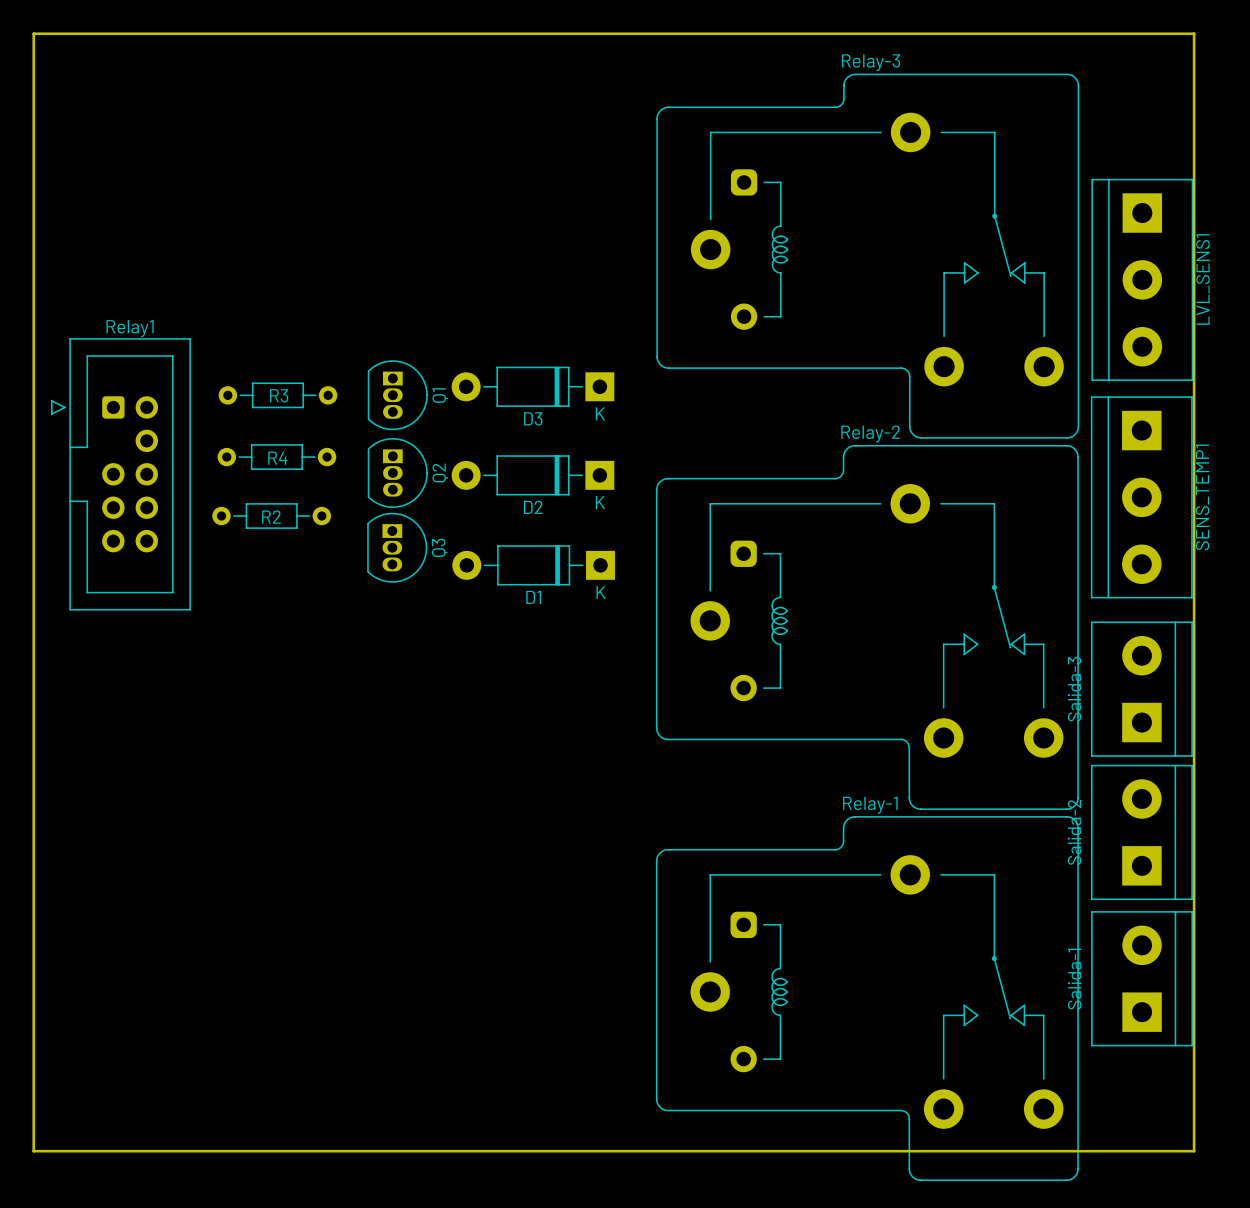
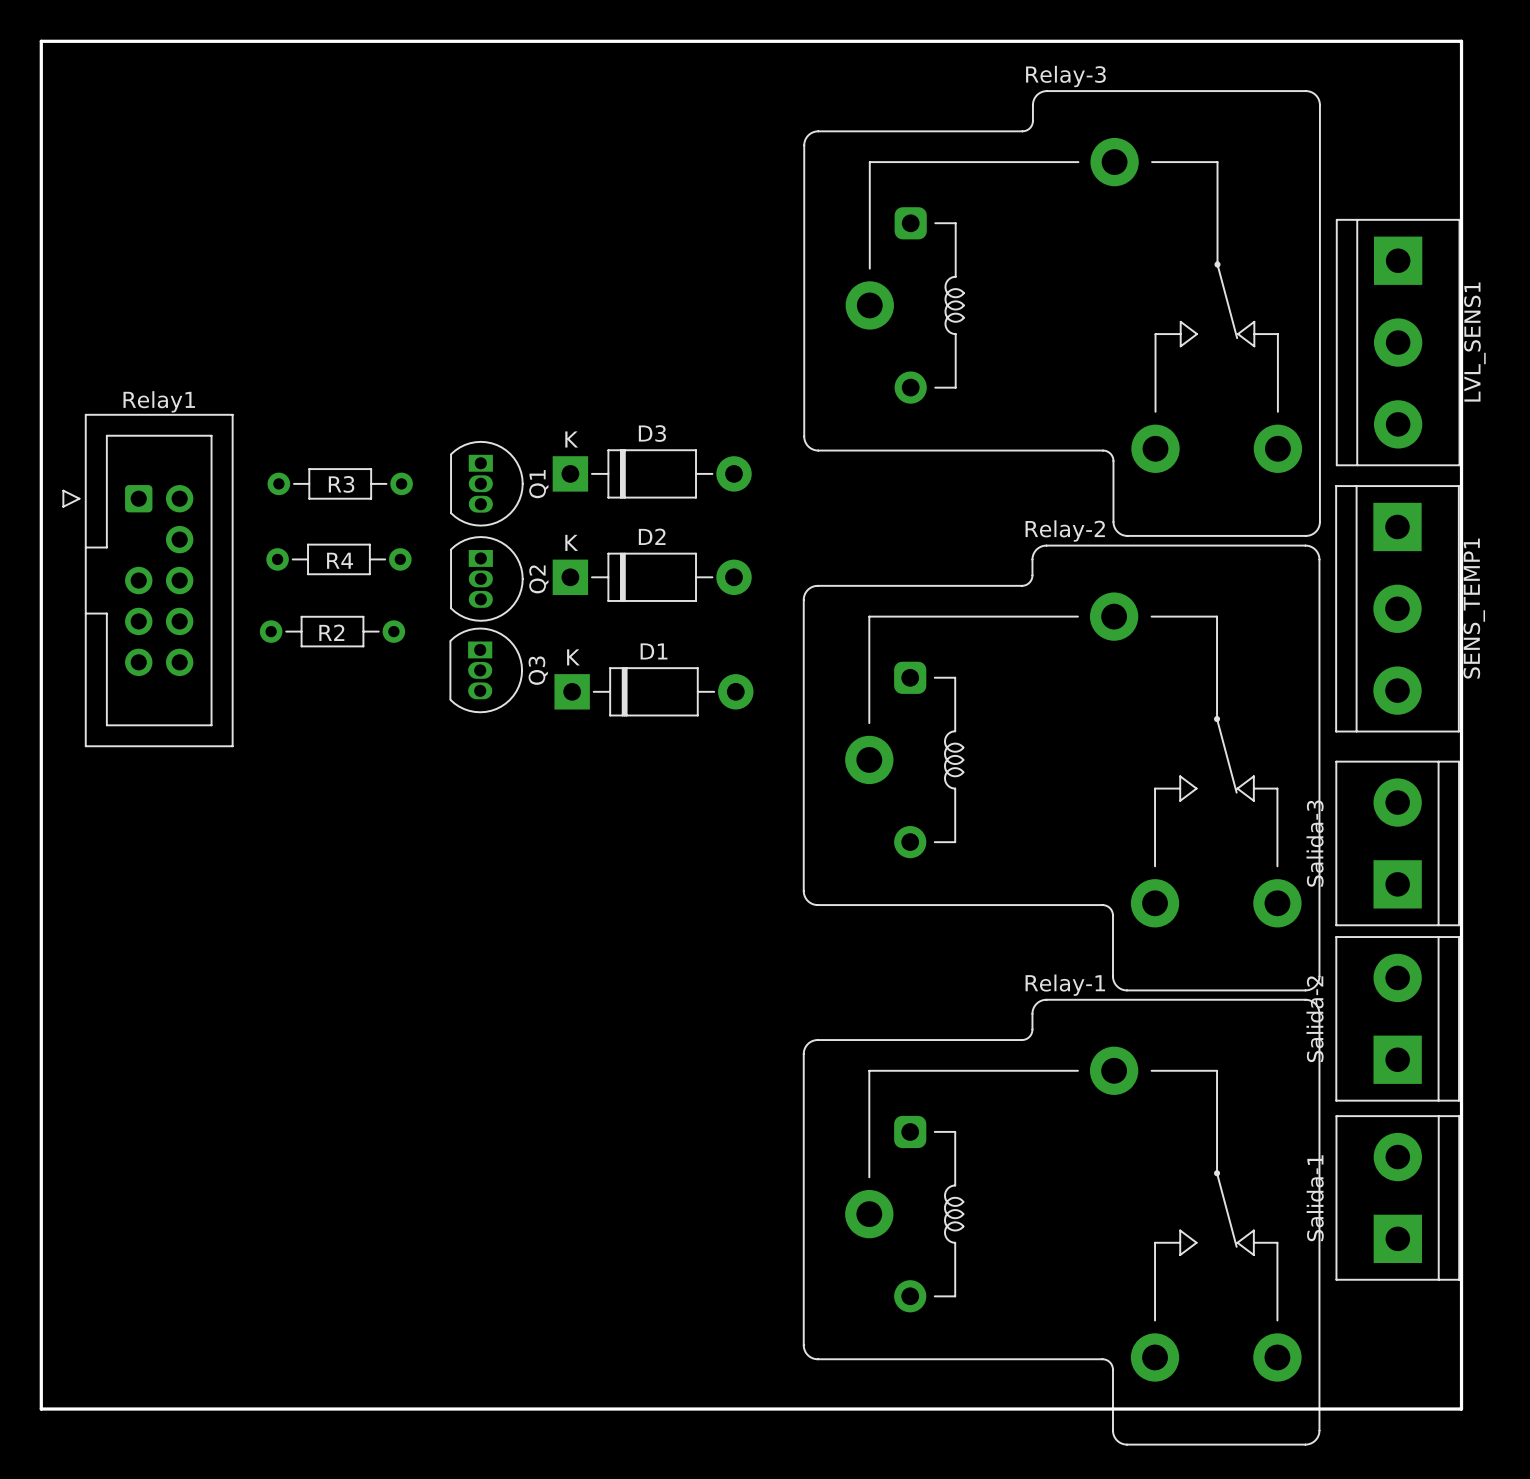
D3 rotation: 0° (532, 386) -> 180° (652, 473)
D2 rotation: 0° (532, 475) -> 180° (652, 577)
D1 rotation: 0° (533, 565) -> 180° (653, 691)

